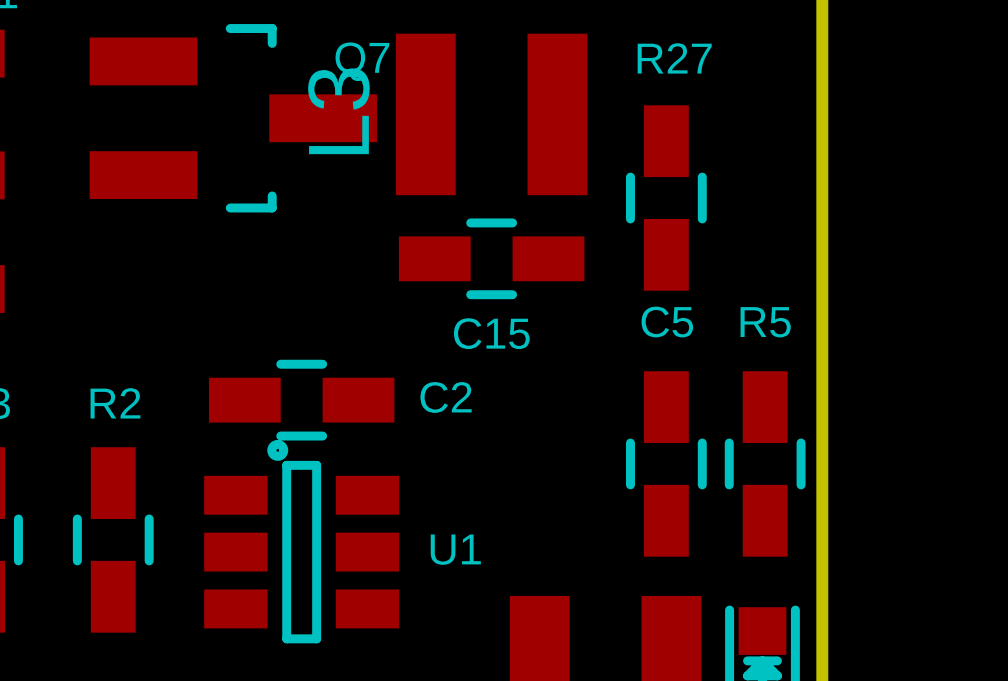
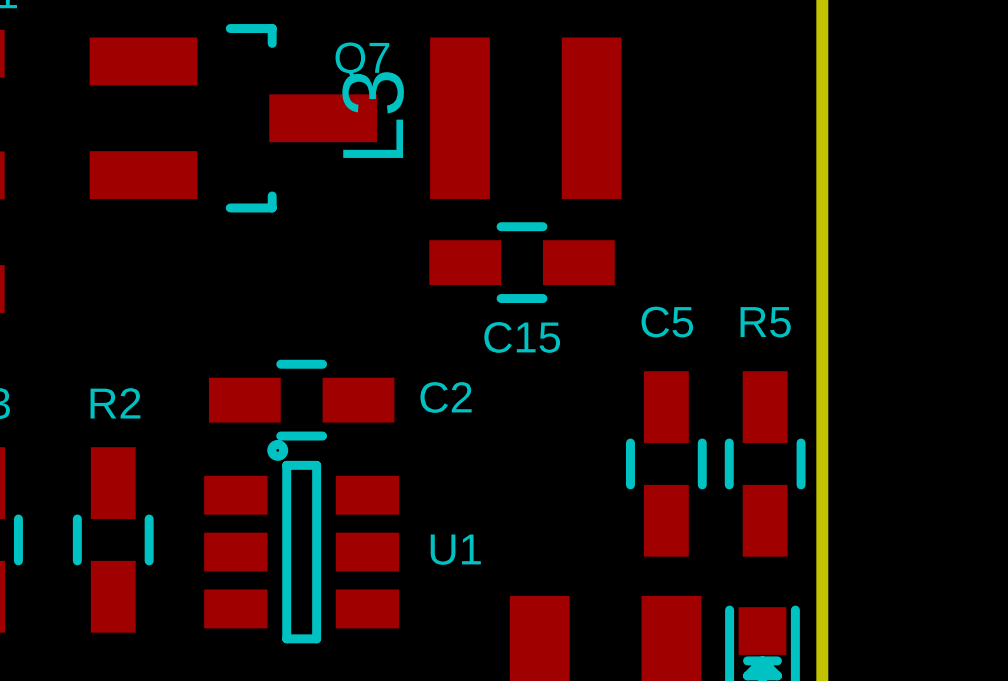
L3 position: (491, 114) -> (525, 118)
R27: (666, 198) -> none
C15 position: (491, 258) -> (522, 262)

